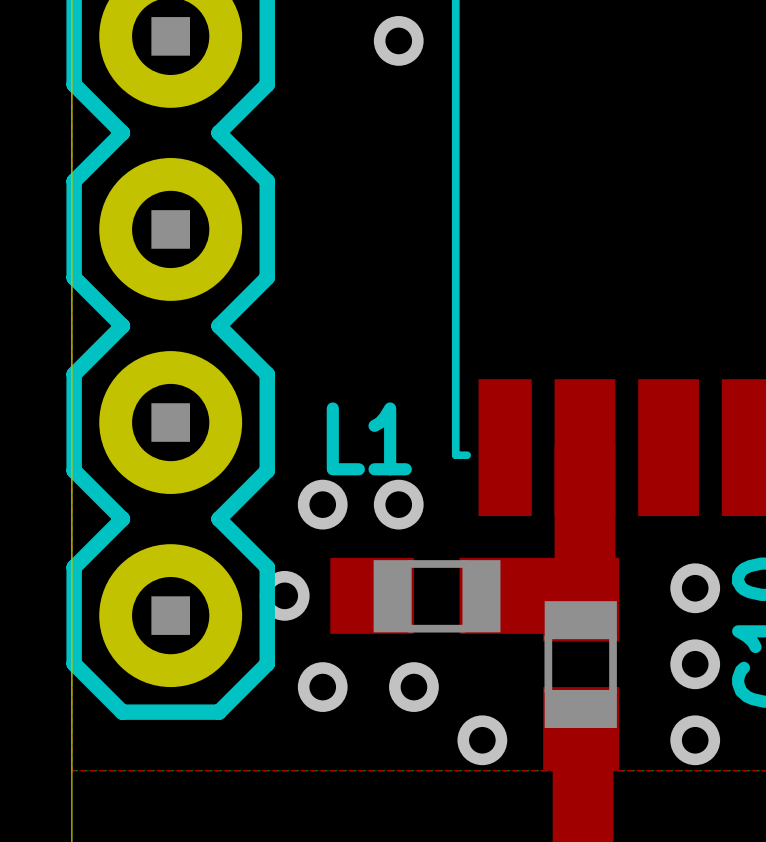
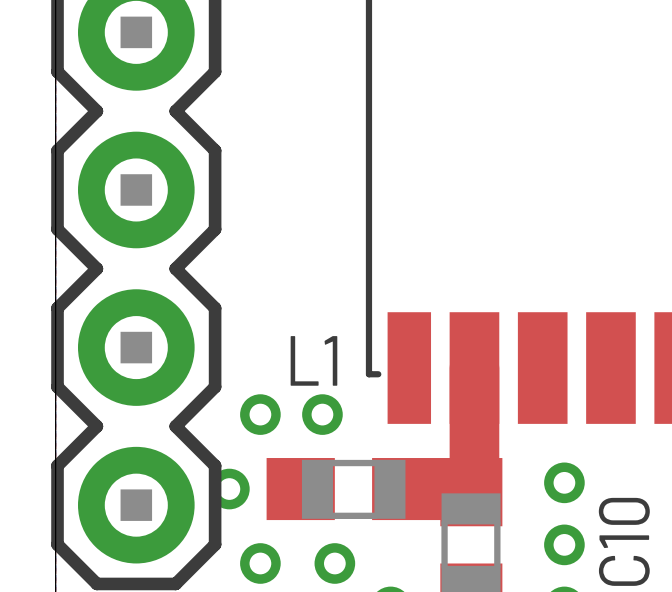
via: (398, 40) -> none

